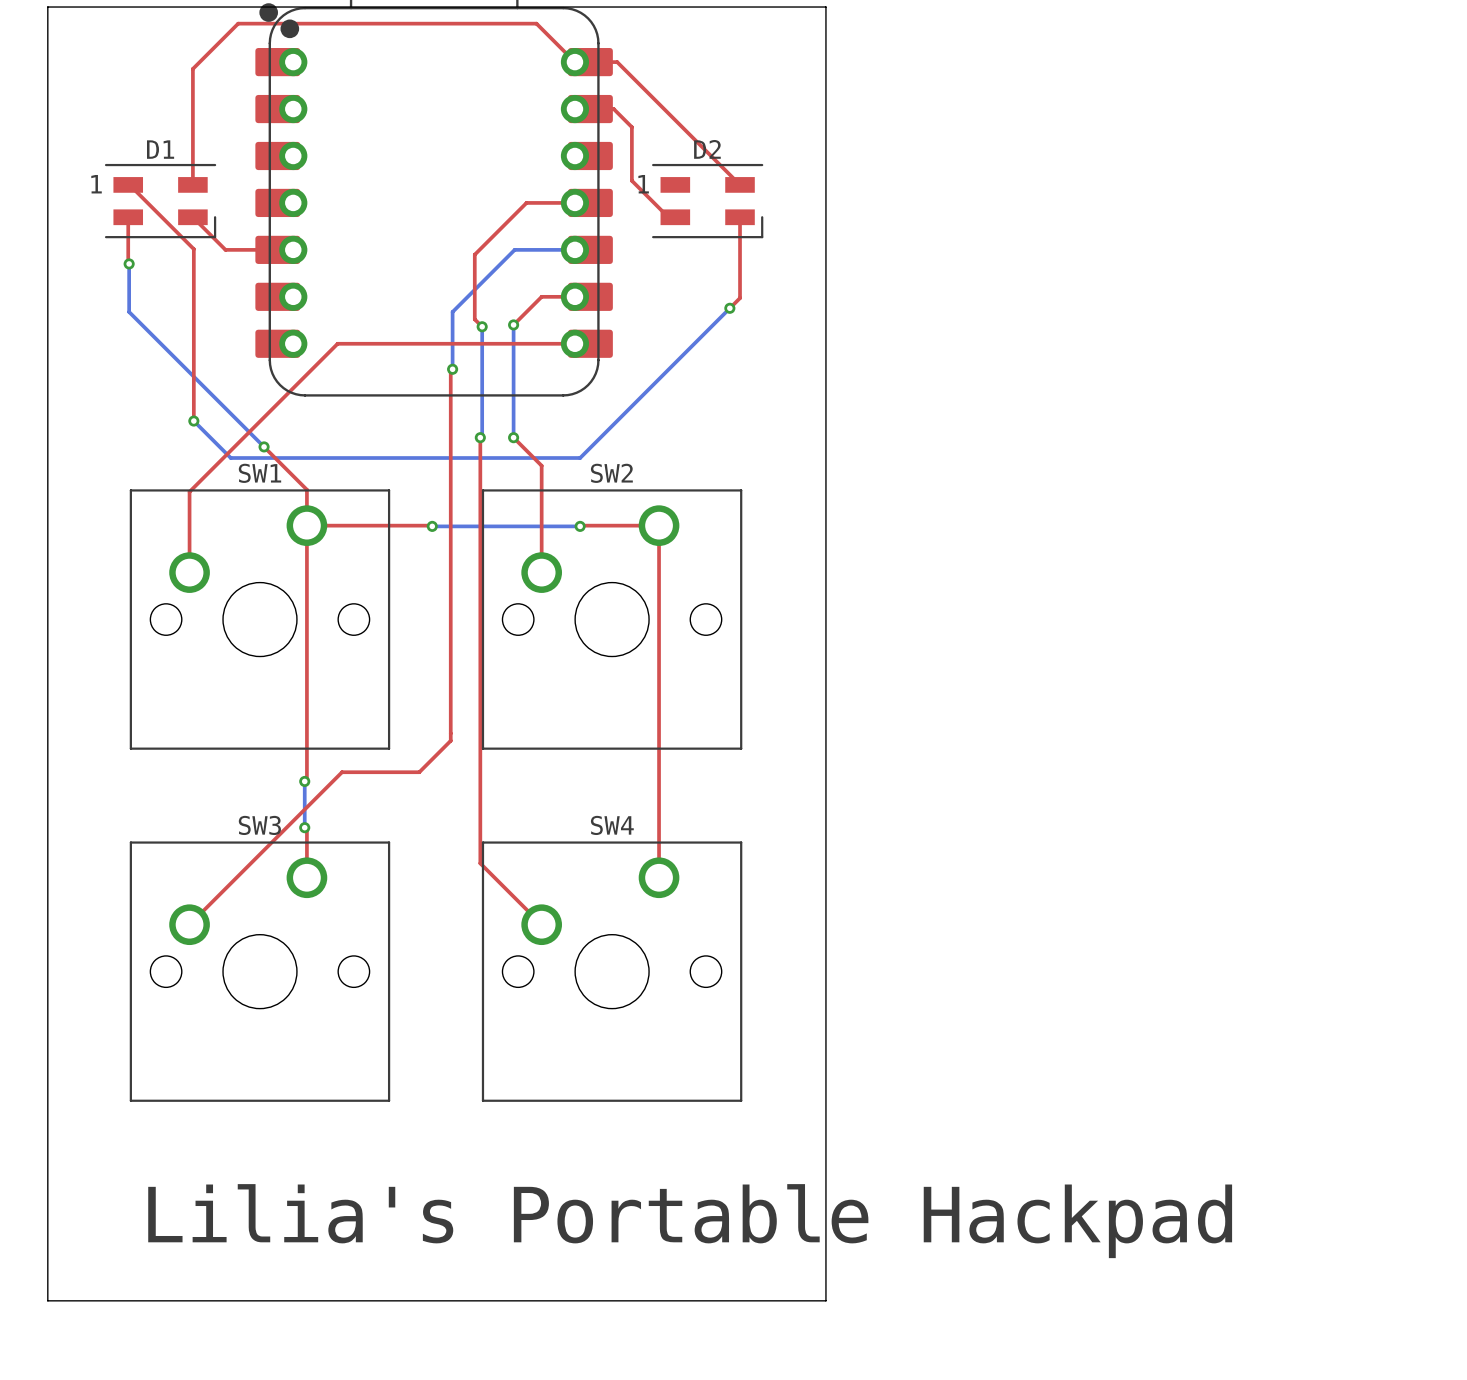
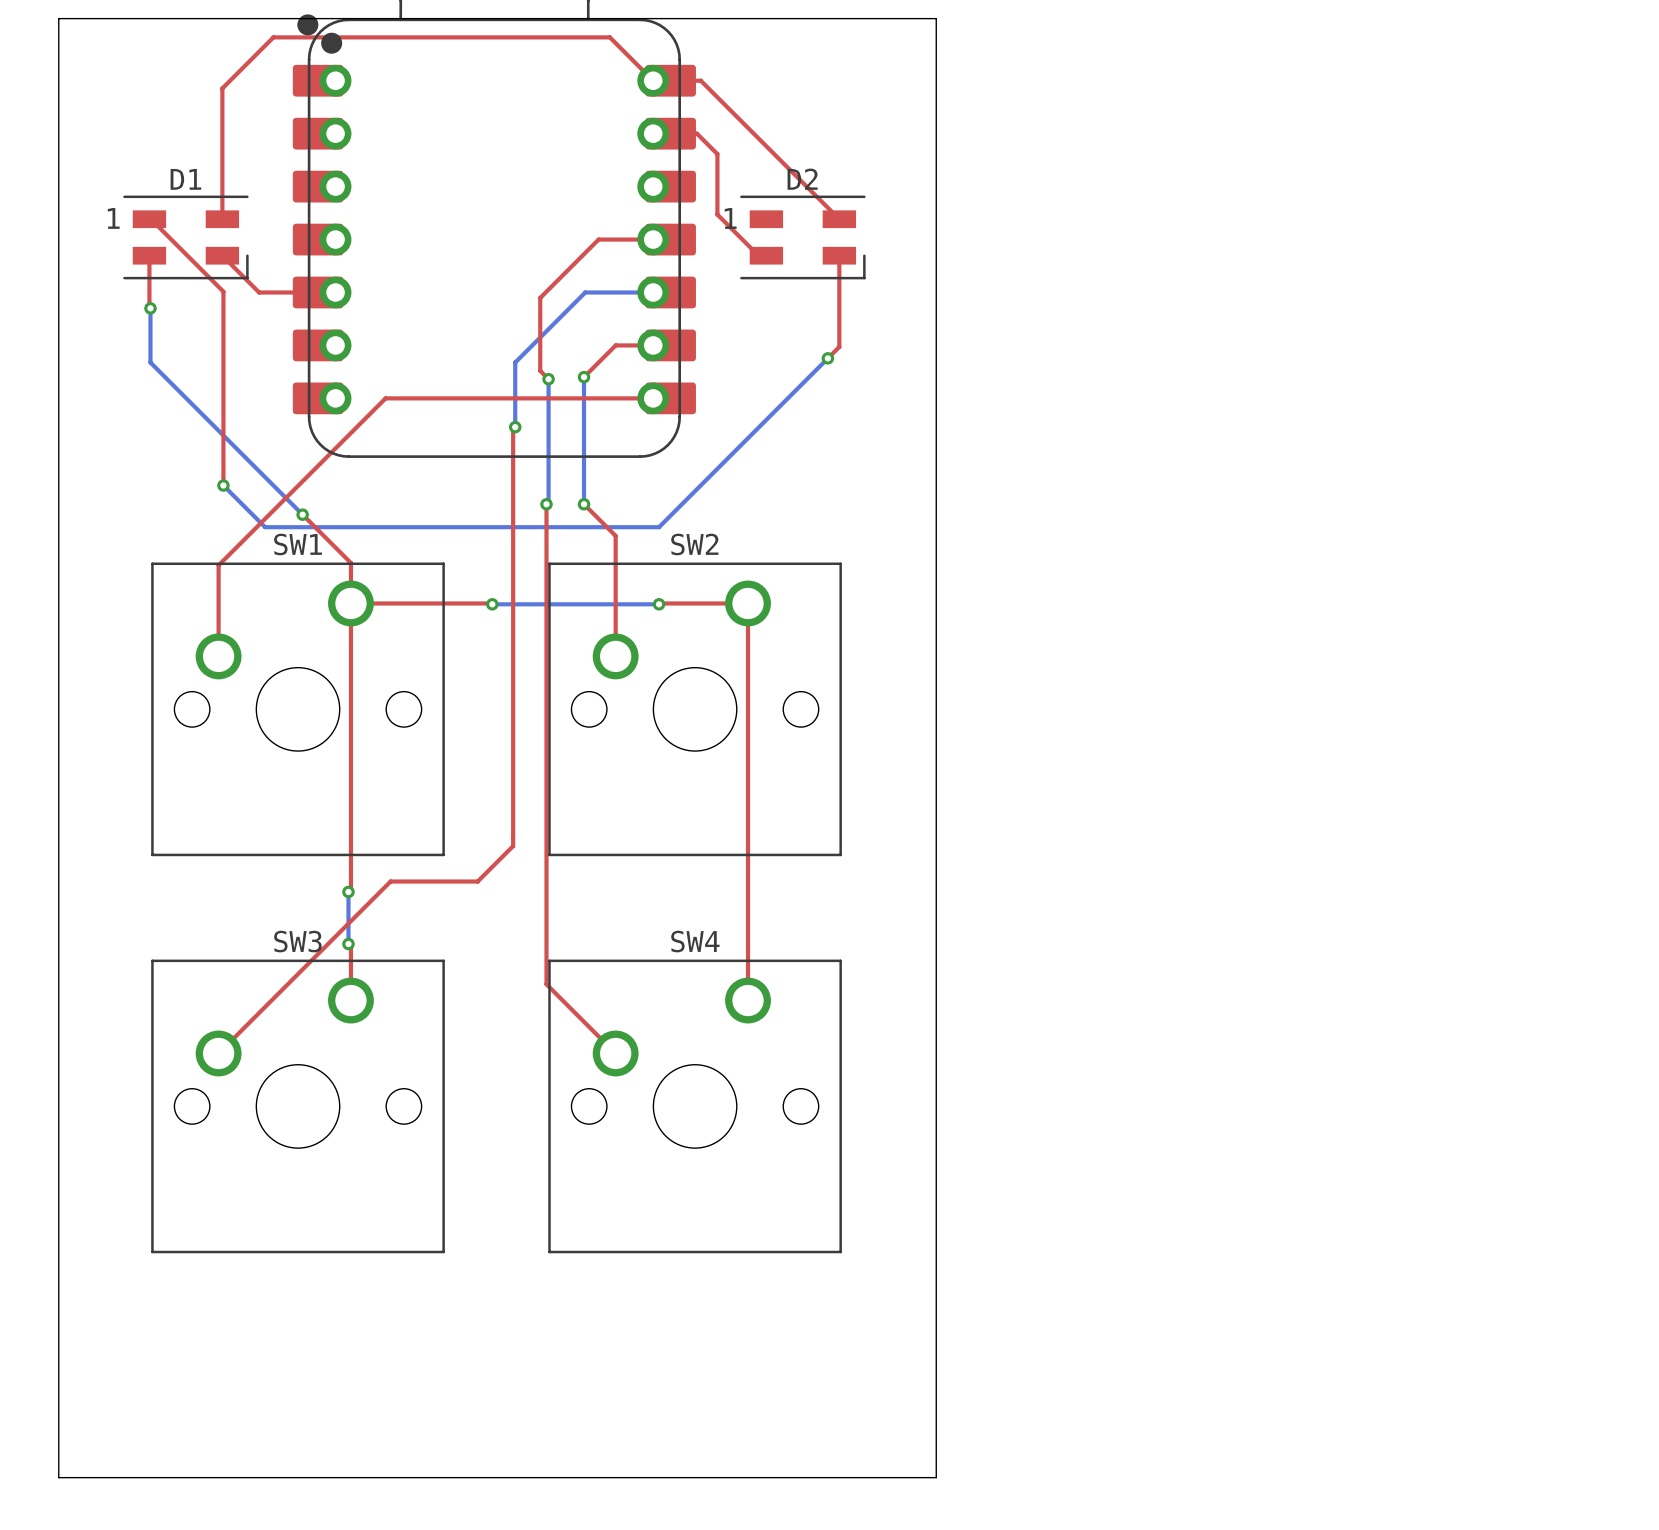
text: Lilia's Portable Hackpad (690, 1221) -> none

